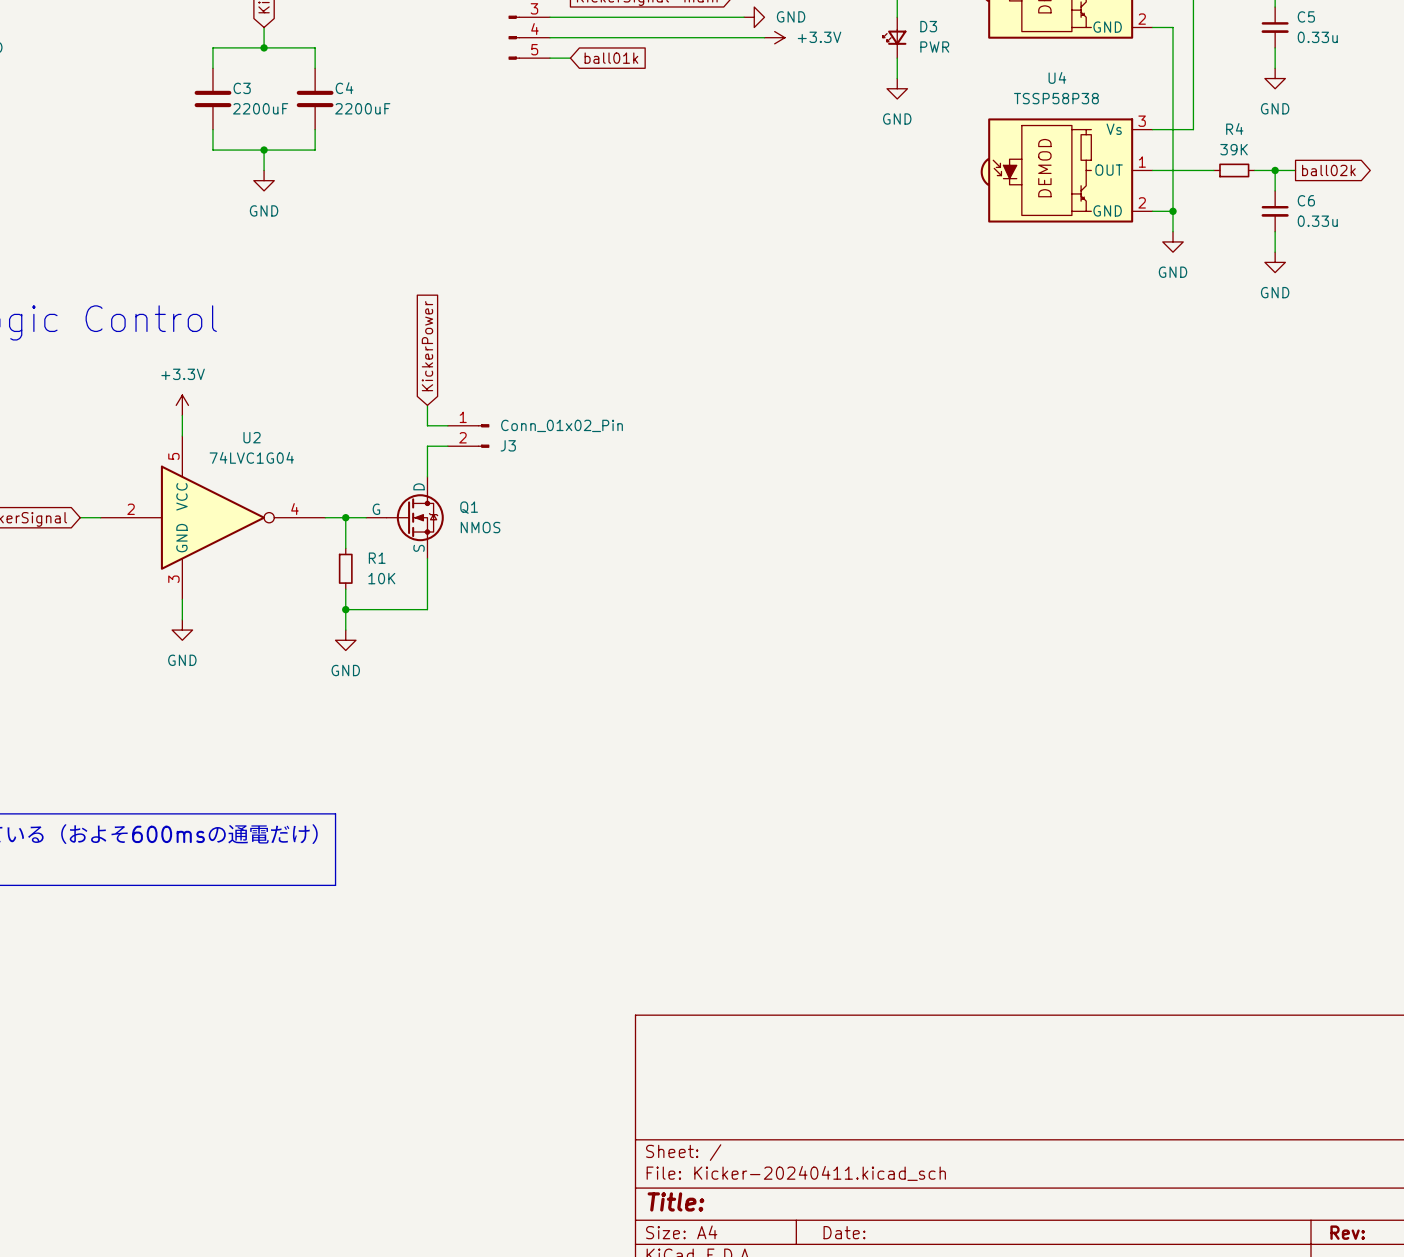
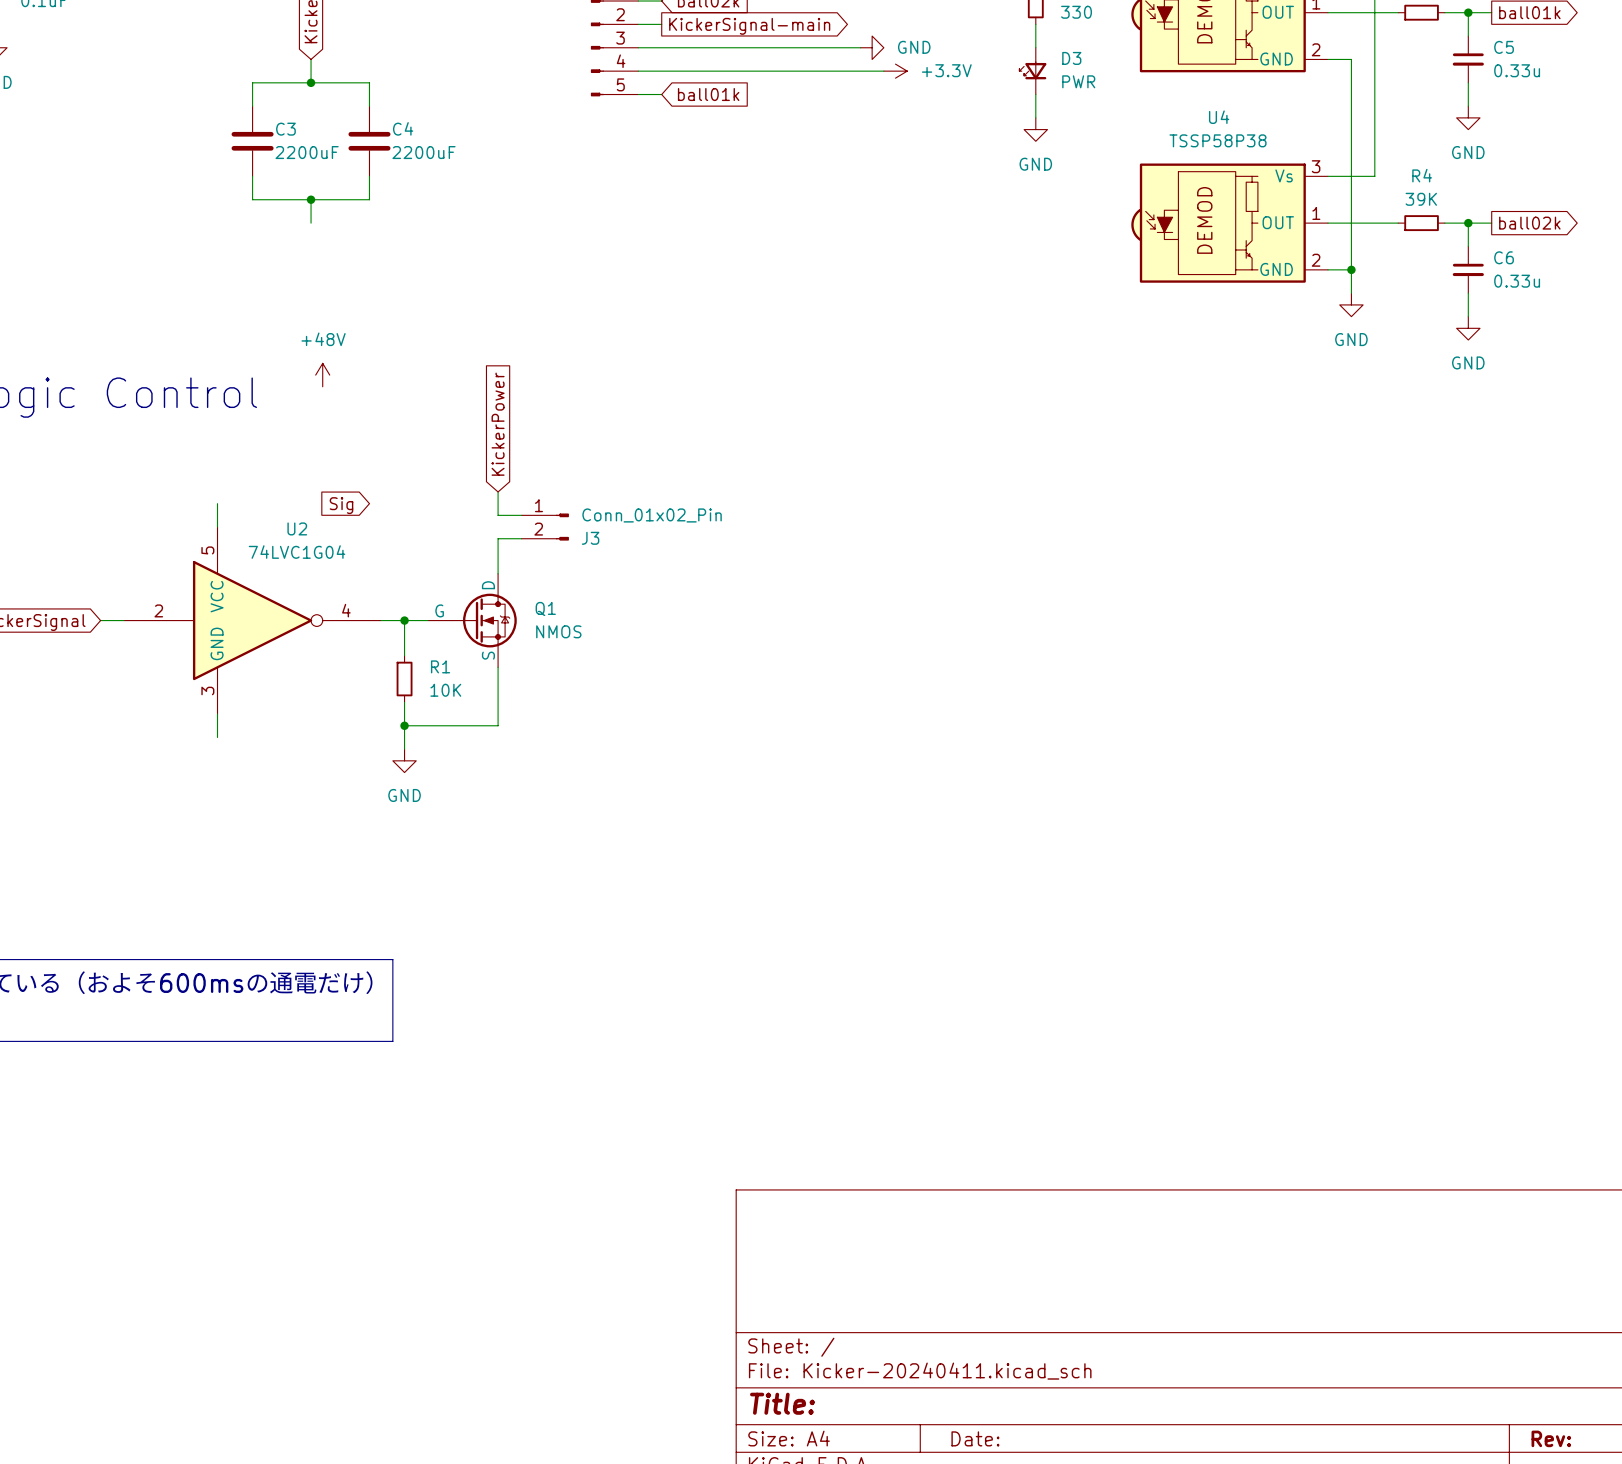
power symbol: GND (264, 180) -> none
power symbol: none -> +48V (322, 375)
power symbol: +3.3V (182, 405) -> none
global label: none -> Sig (341, 505)
power symbol: GND (182, 630) -> none

